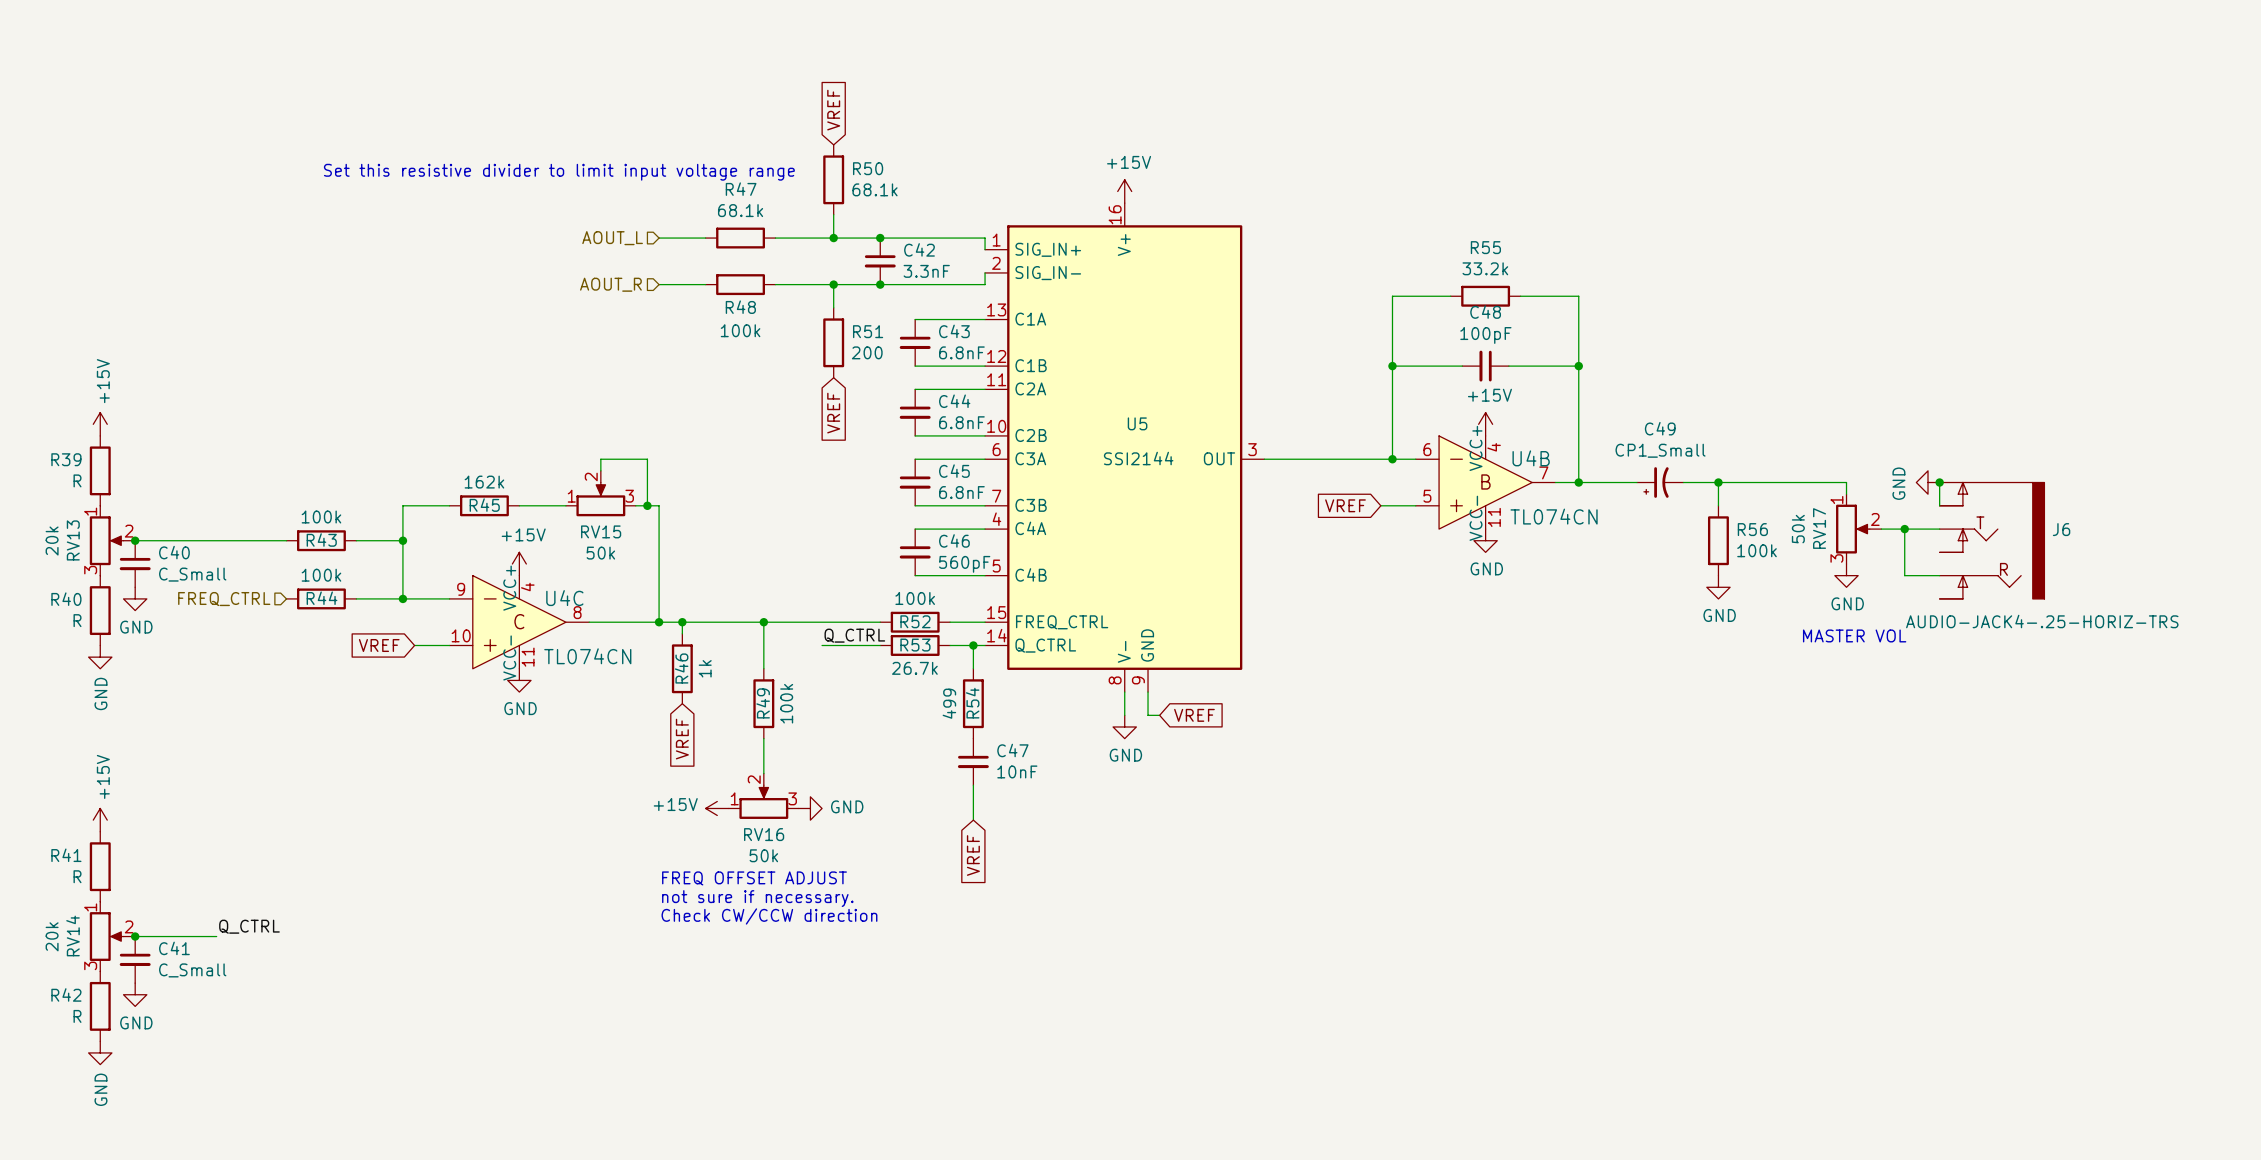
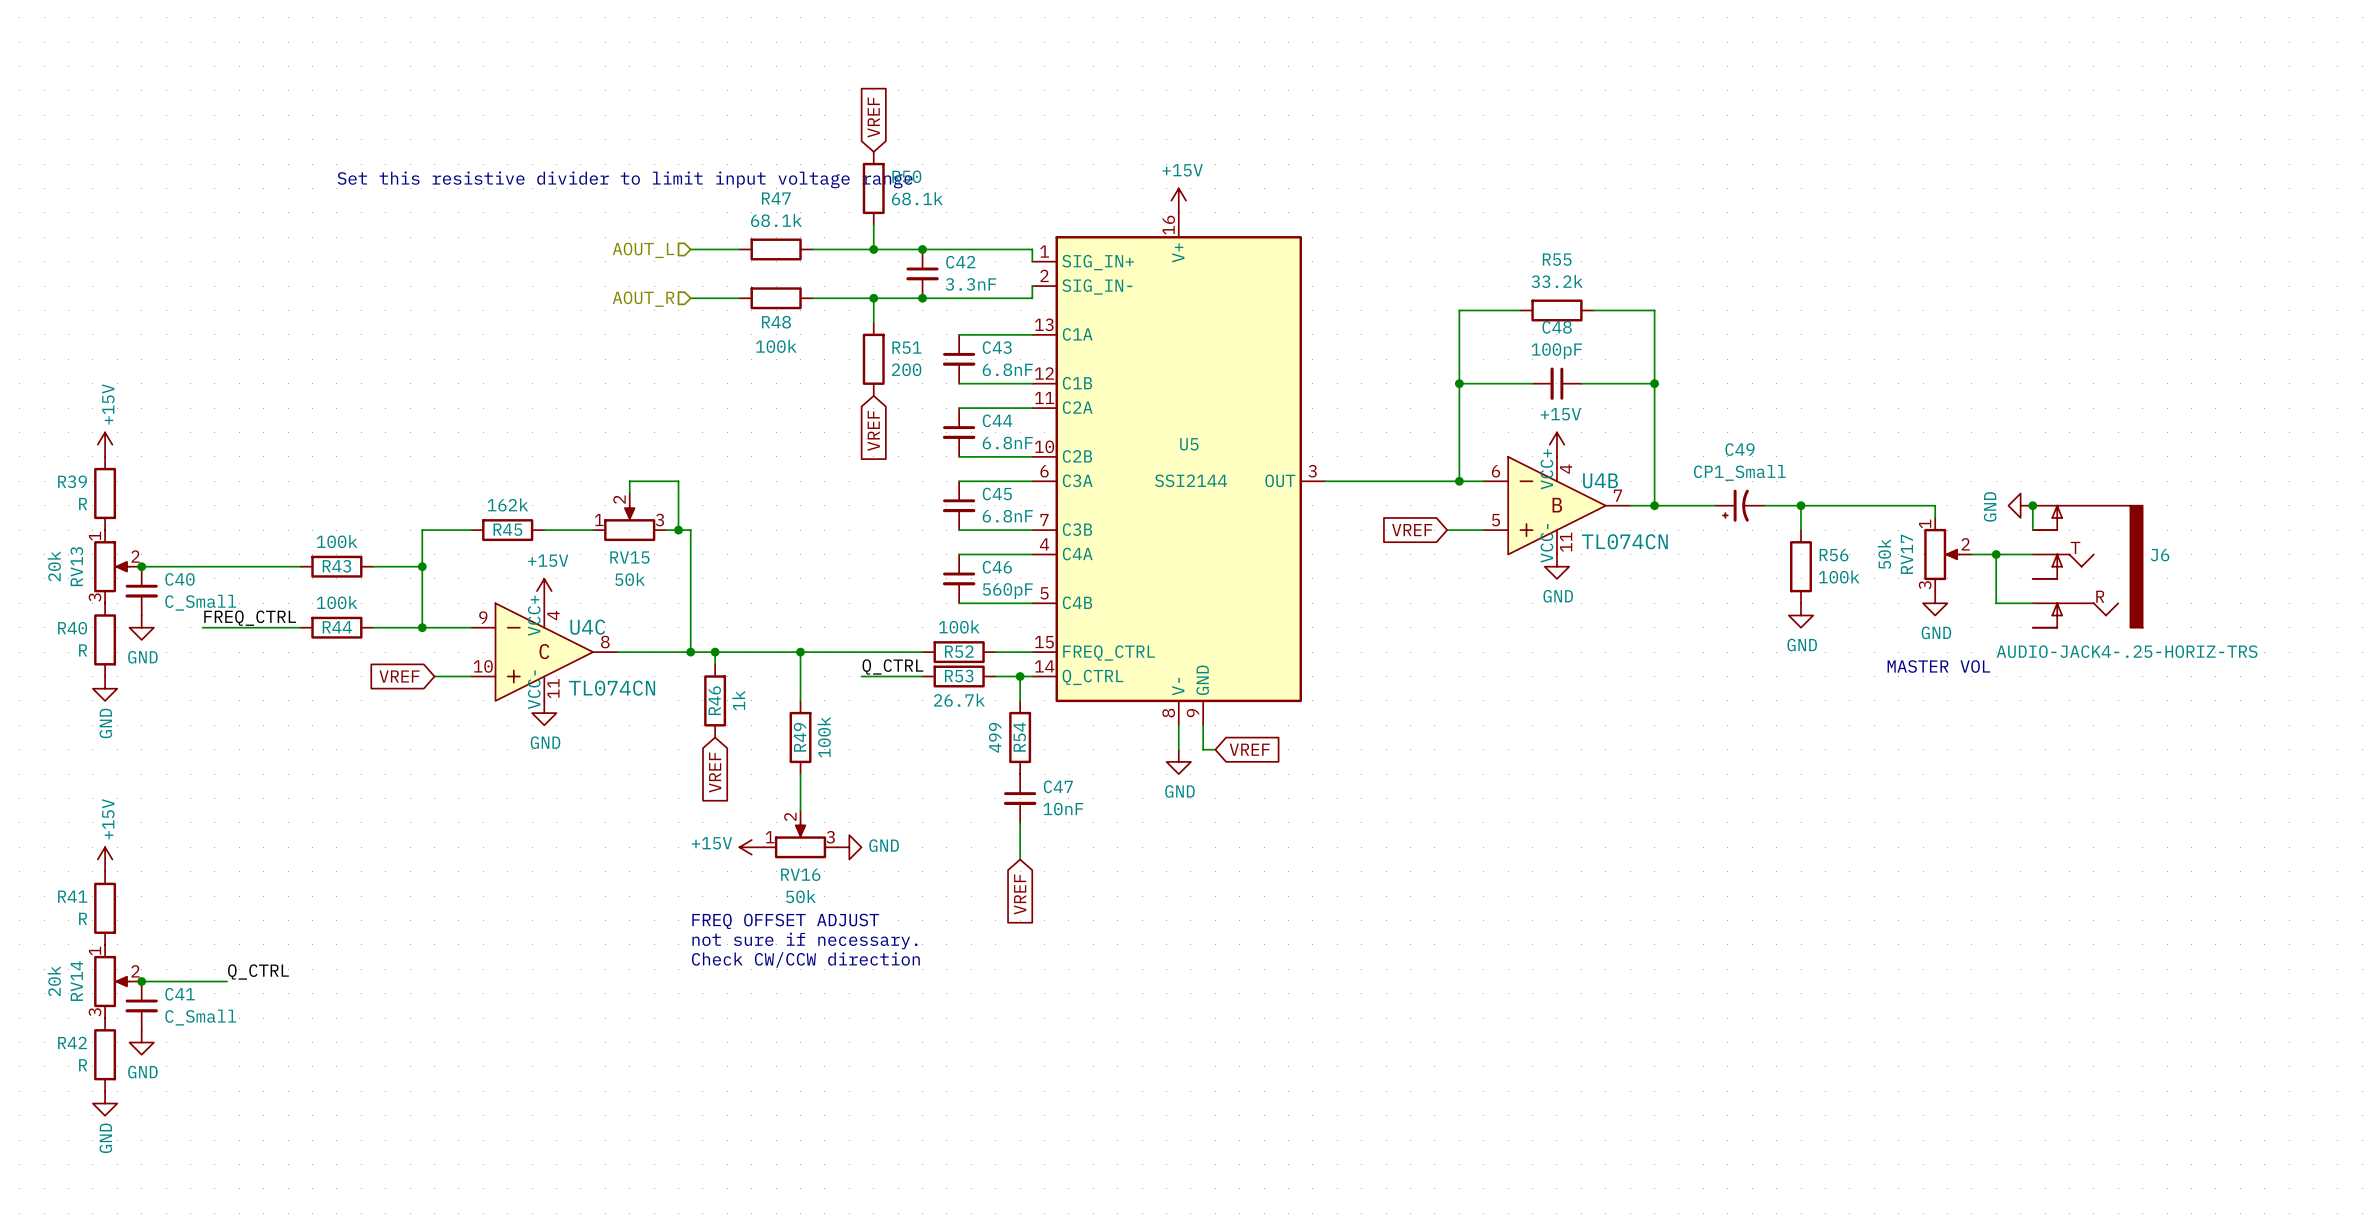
label: none -> FREQ_CTRL (250, 618)
wire: none -> (202, 627) (300, 627)
hierarchical label: FREQ_CTRL (224, 599) -> none

